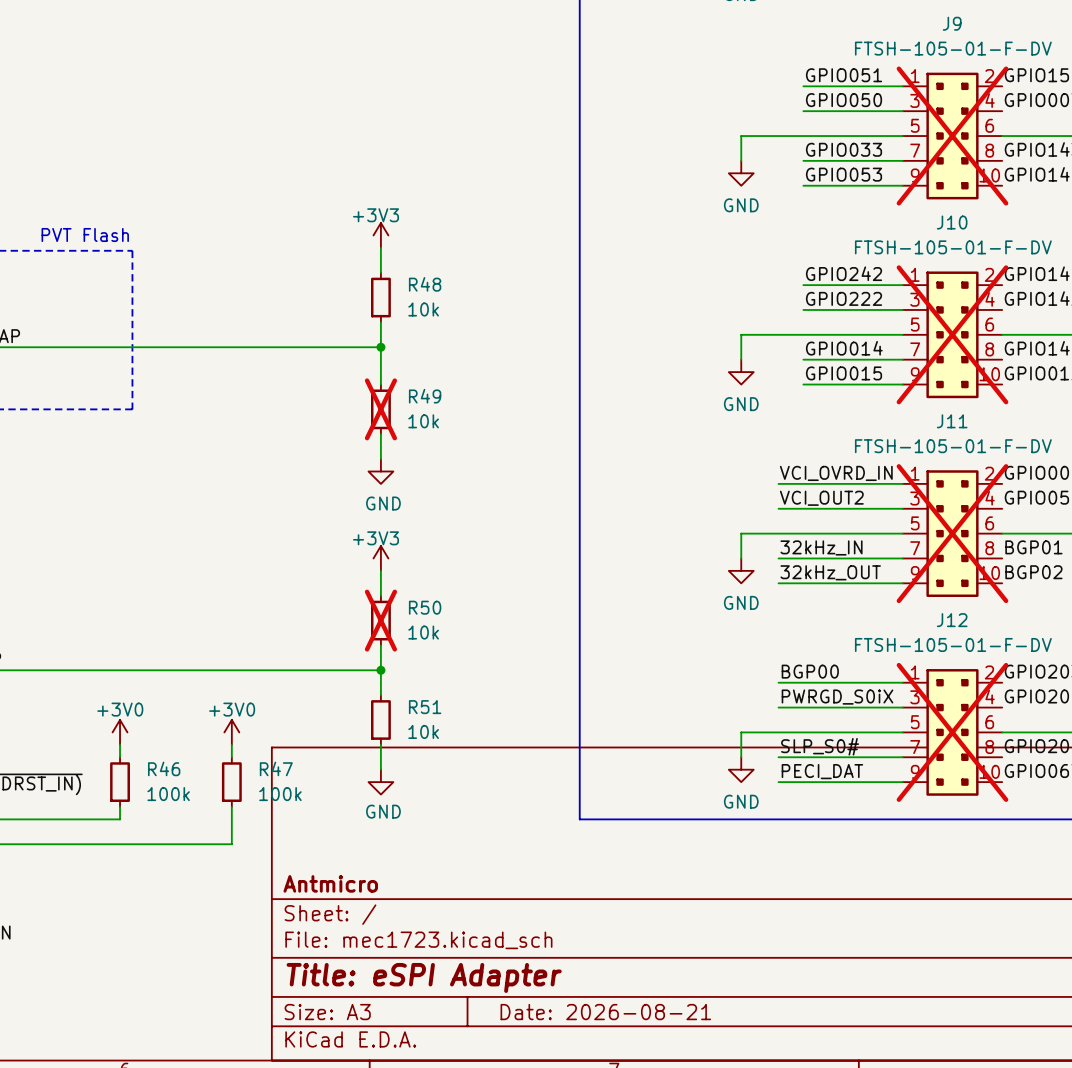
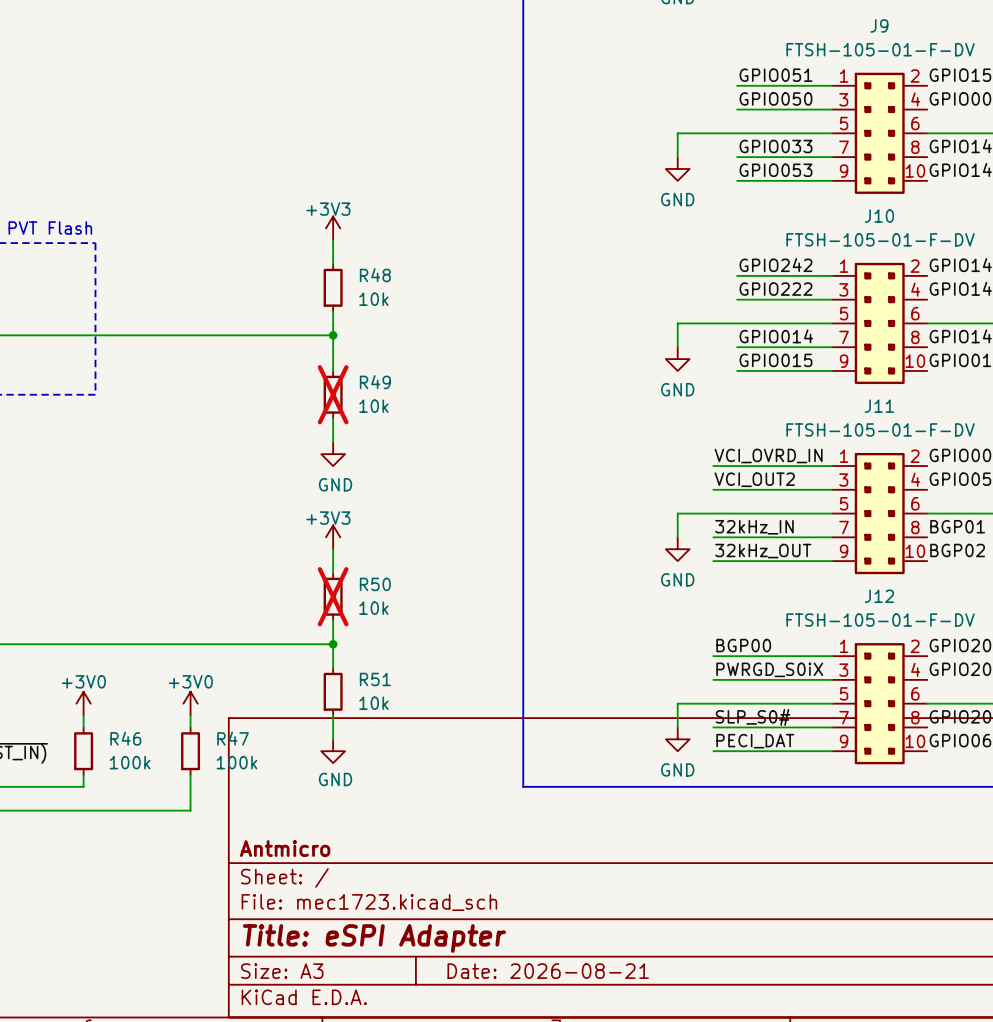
J9 do-not-place cross: (952, 136) -> none
J10 do-not-place cross: (952, 334) -> none
J11 do-not-place cross: (952, 533) -> none
J12 do-not-place cross: (952, 732) -> none

